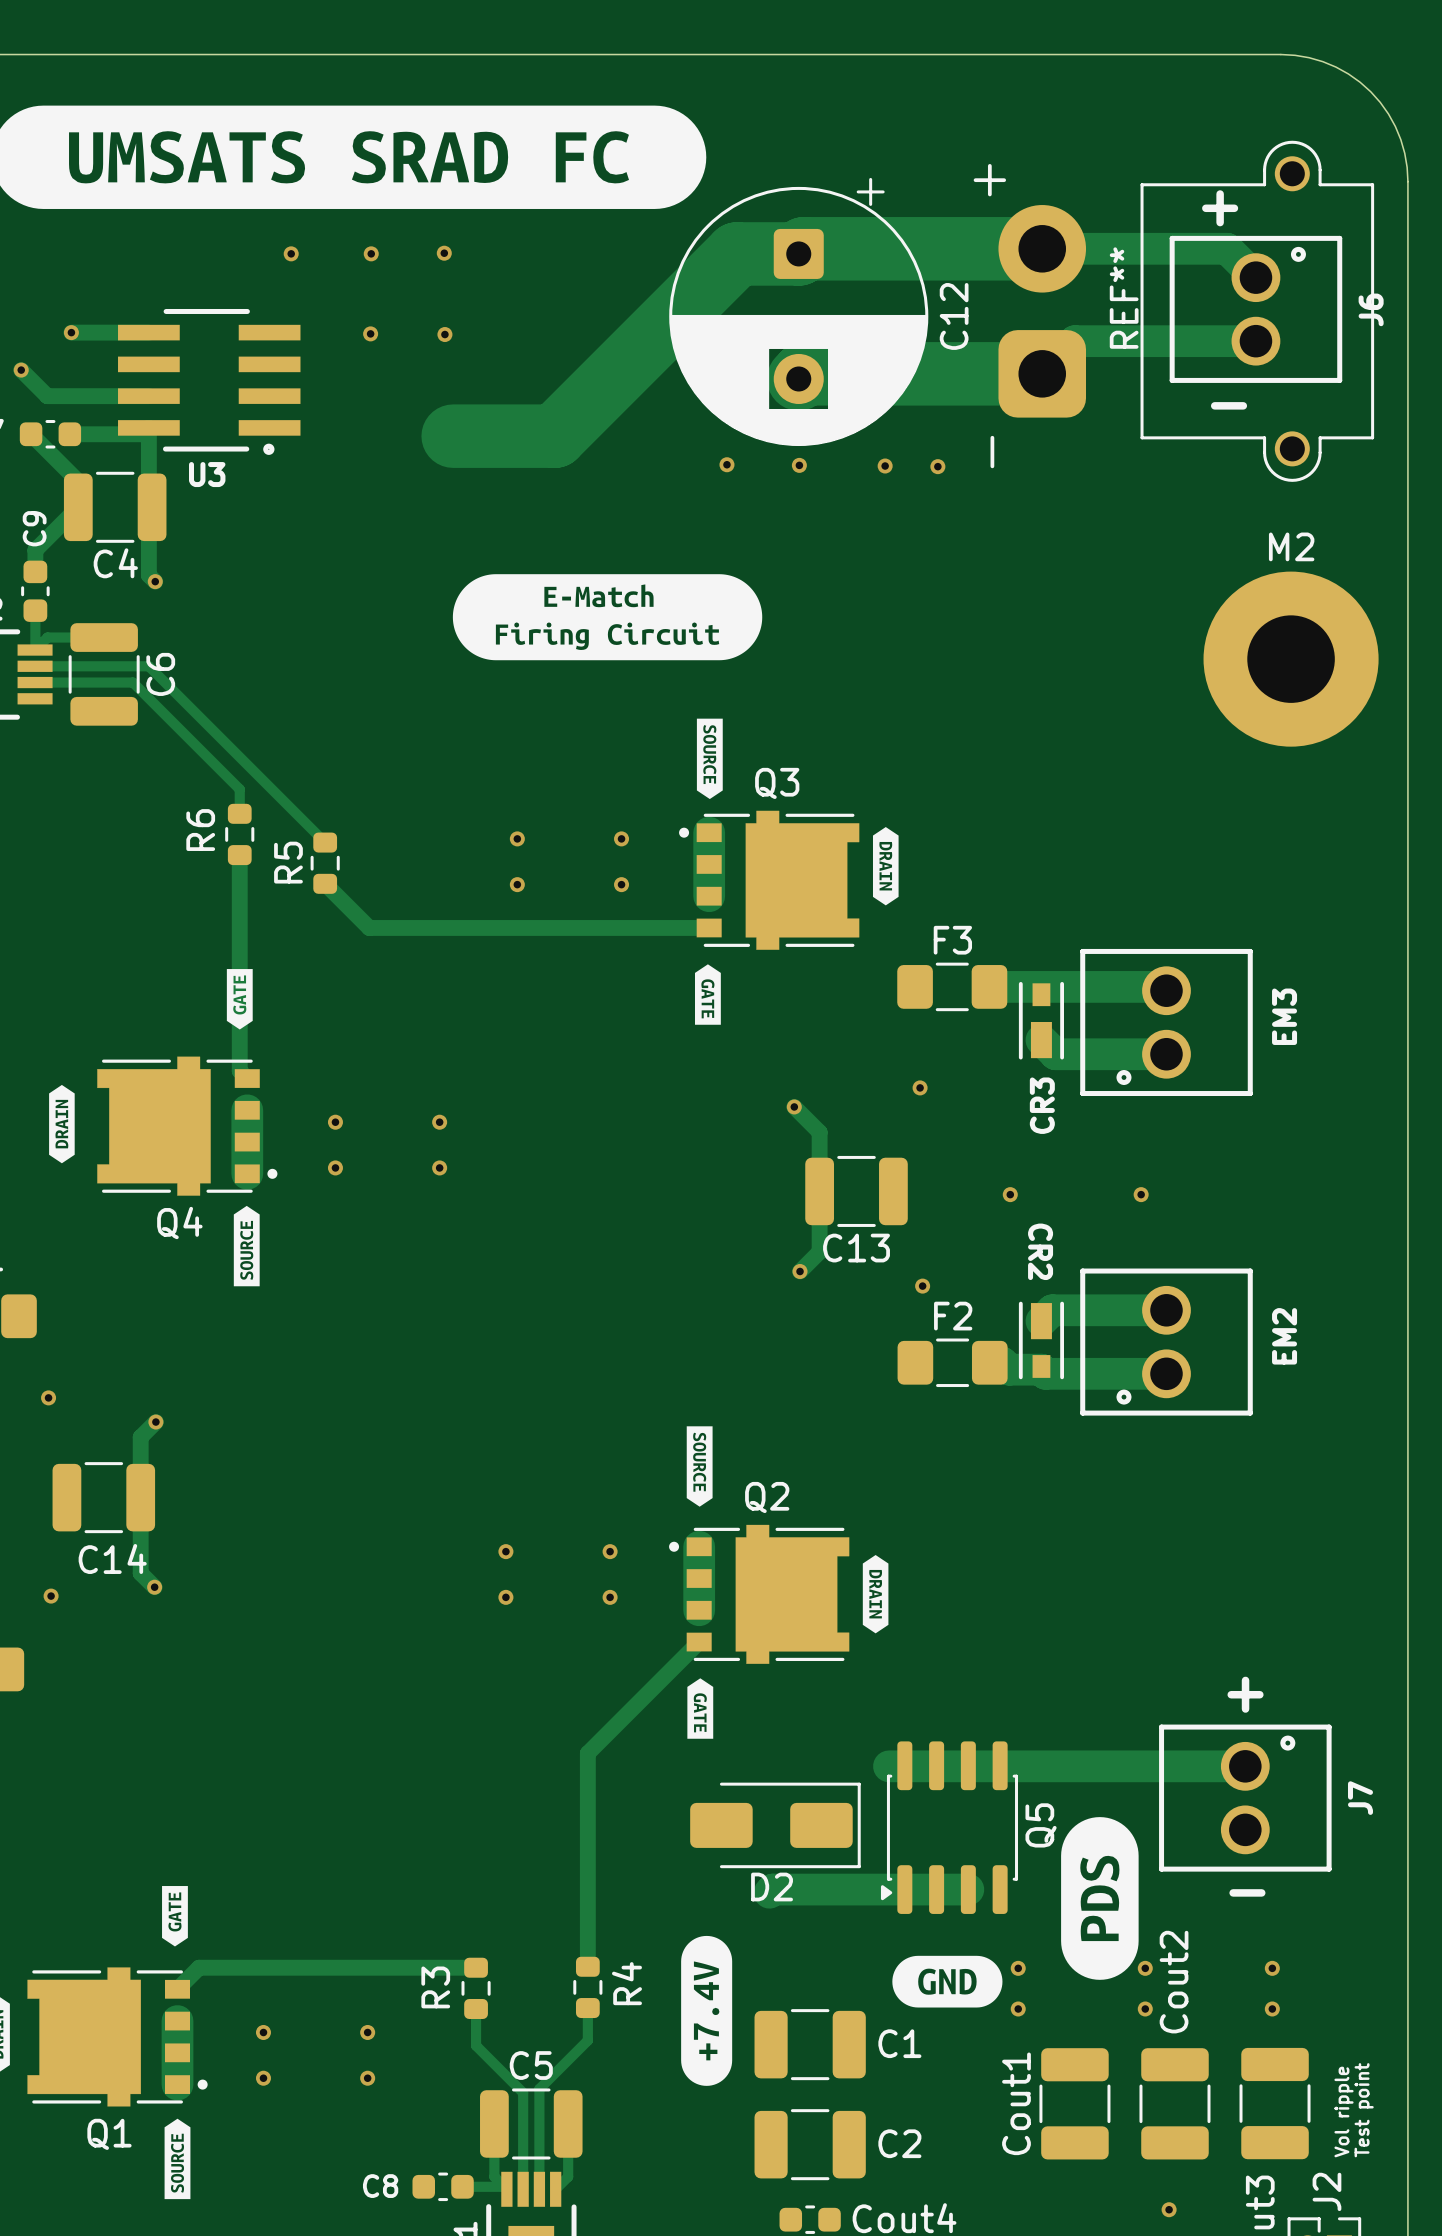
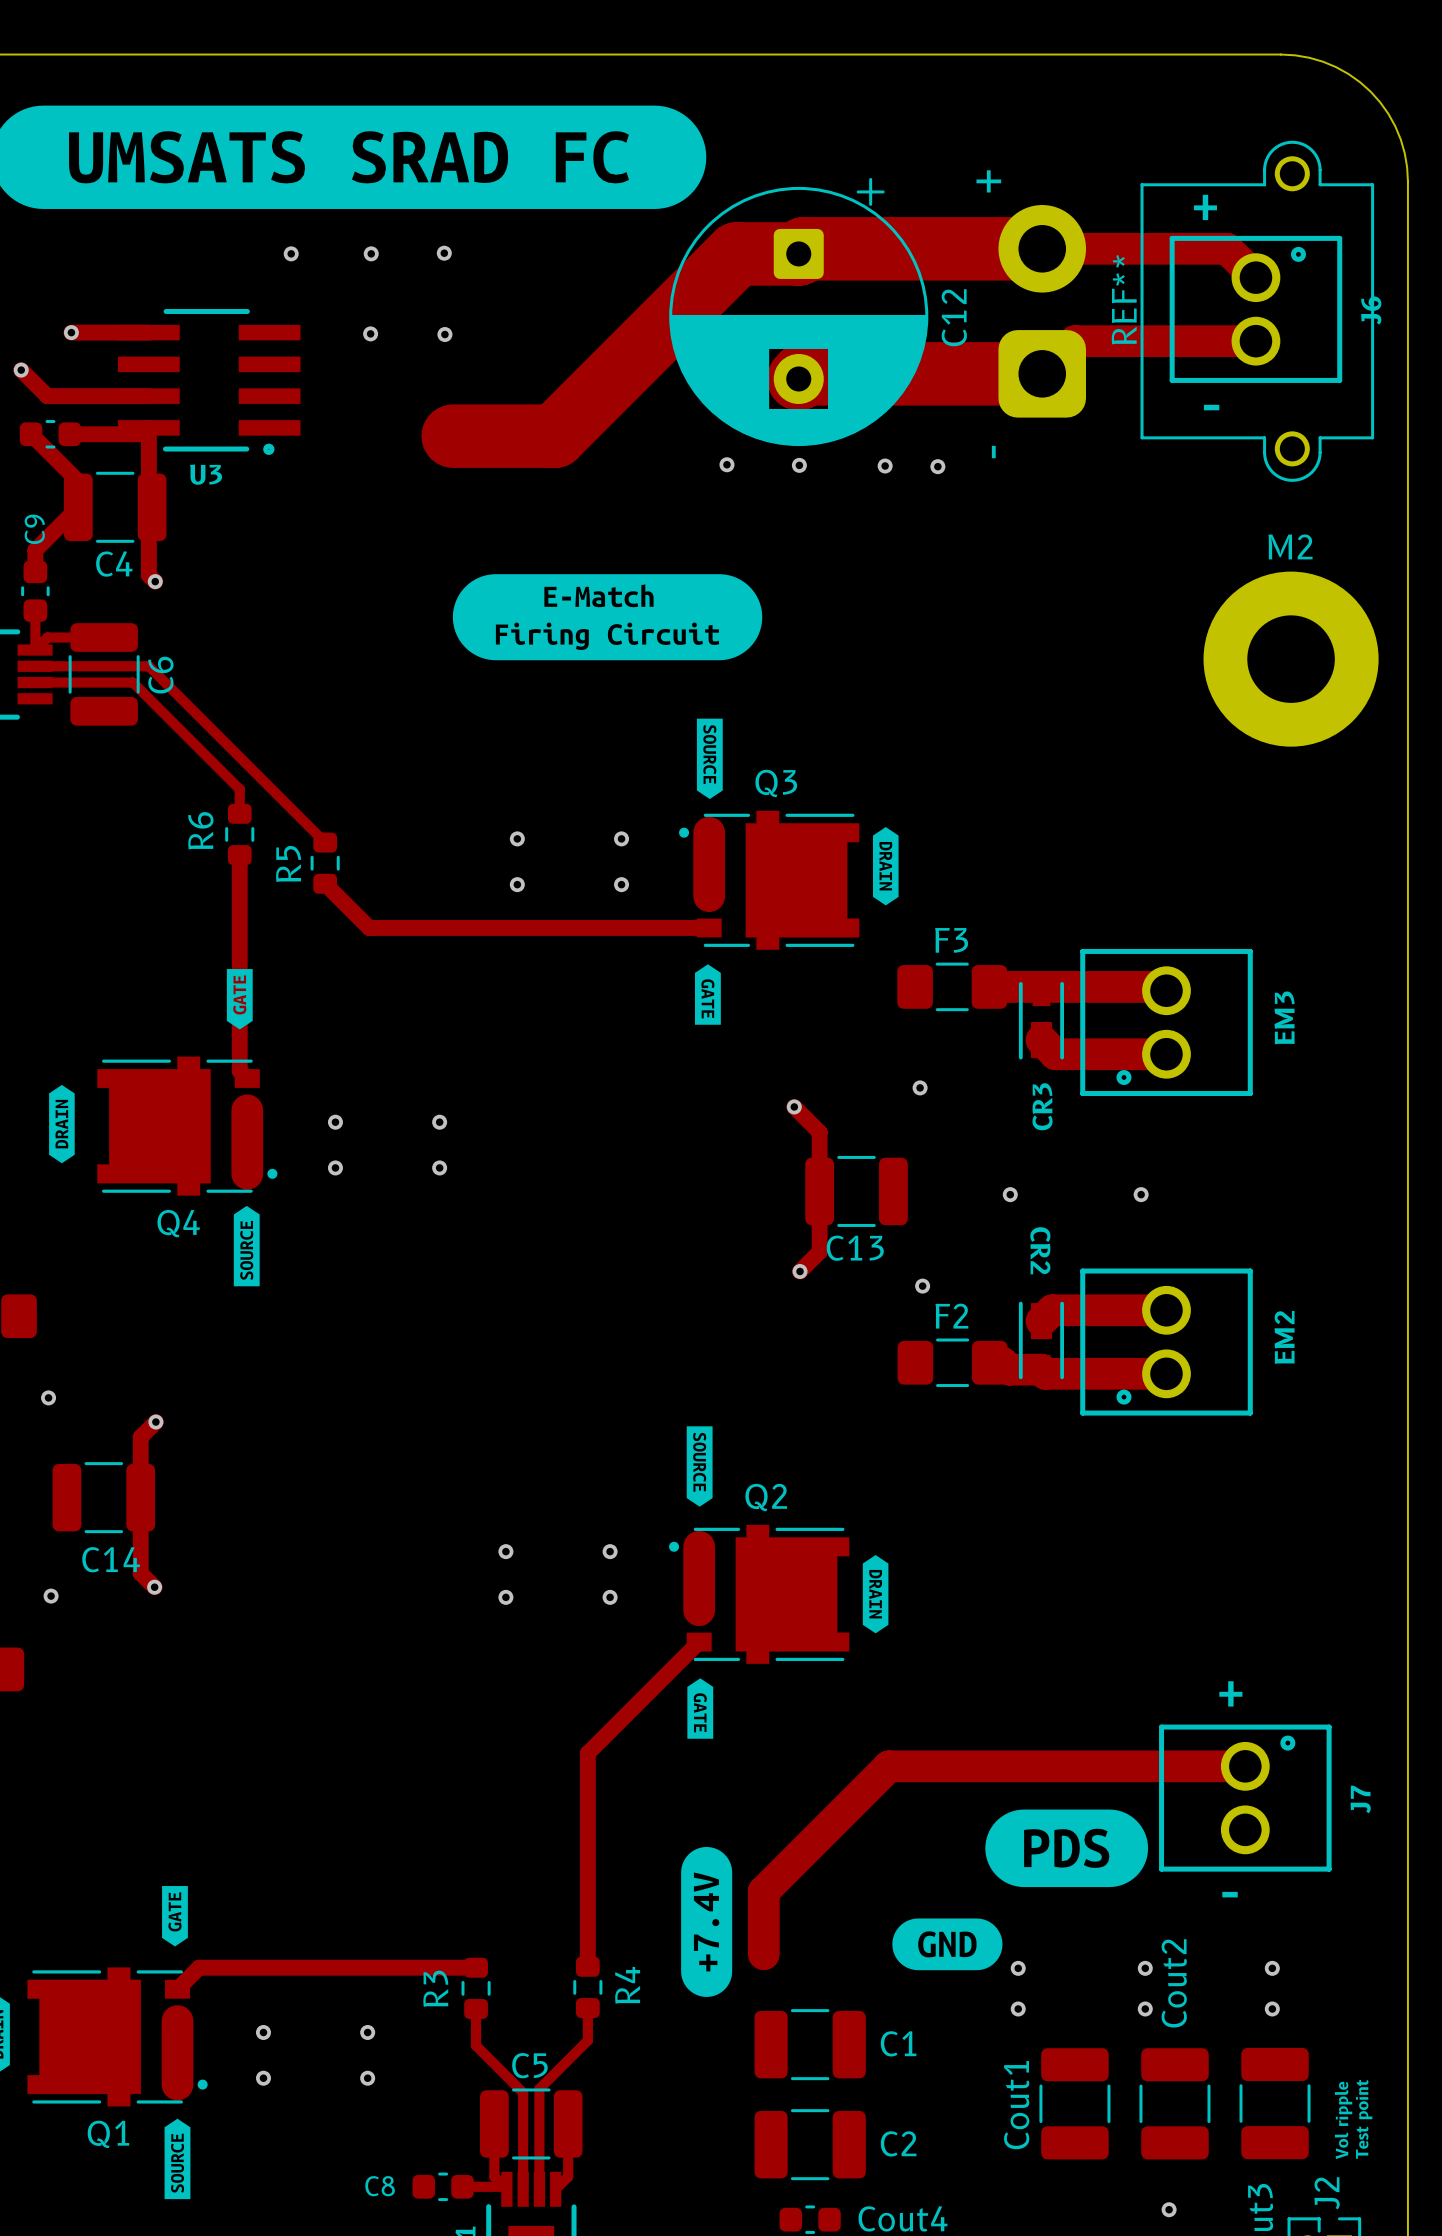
track: none -> (888, 1766) (763, 1891) (763, 1954)
drawing: none -> [985, 1809, 1149, 1888]
drawing: [1061, 1817, 1139, 1980] -> none
D2: (775, 1825) -> none
Q5: (949, 1827) -> none
track: (968, 1889) (772, 1889) (769, 1892) -> none
drawing position: (947, 1981) -> (947, 1944)
drawing position: (706, 2010) -> (706, 1921)

